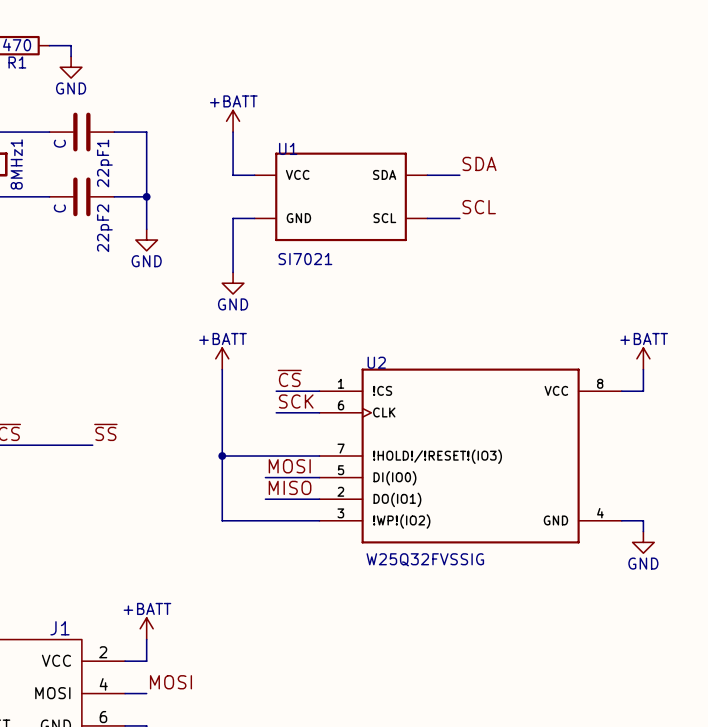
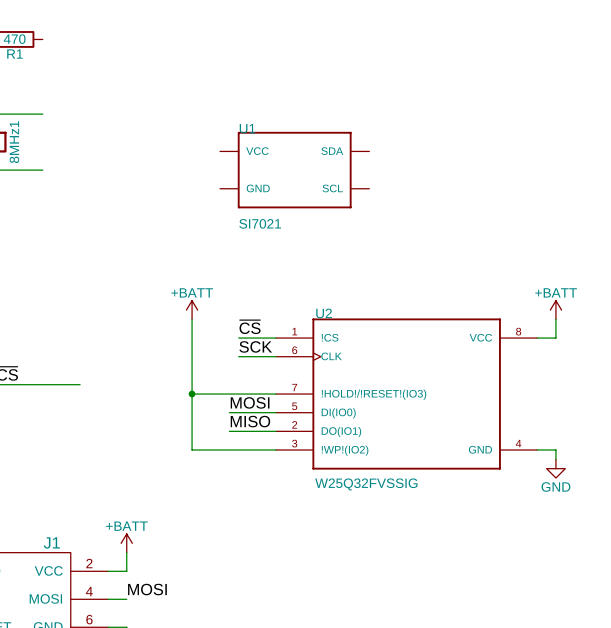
wire: (49, 45) (71, 45) (71, 56) -> none
power symbol: GND (71, 67) -> none
power symbol: +BATT (233, 121) -> none
22pF1: C (81, 132) -> none
wire: (114, 132) (146, 132) (146, 229) -> none
wire: (233, 132) (233, 175) (254, 175) -> none
label: SDA (479, 163) -> none
wire: (427, 175) (459, 175) -> none
22pF2: C (81, 196) -> none
wire: (114, 196) (146, 196) -> none
junction: (146, 196) -> none
label: SCL (479, 207) -> none
wire: (254, 218) (233, 218) (233, 272) -> none
wire: (427, 218) (459, 218) -> none
power symbol: GND (146, 240) -> none
power symbol: GND (233, 283) -> none
label: ~{SS} (105, 432) -> none

